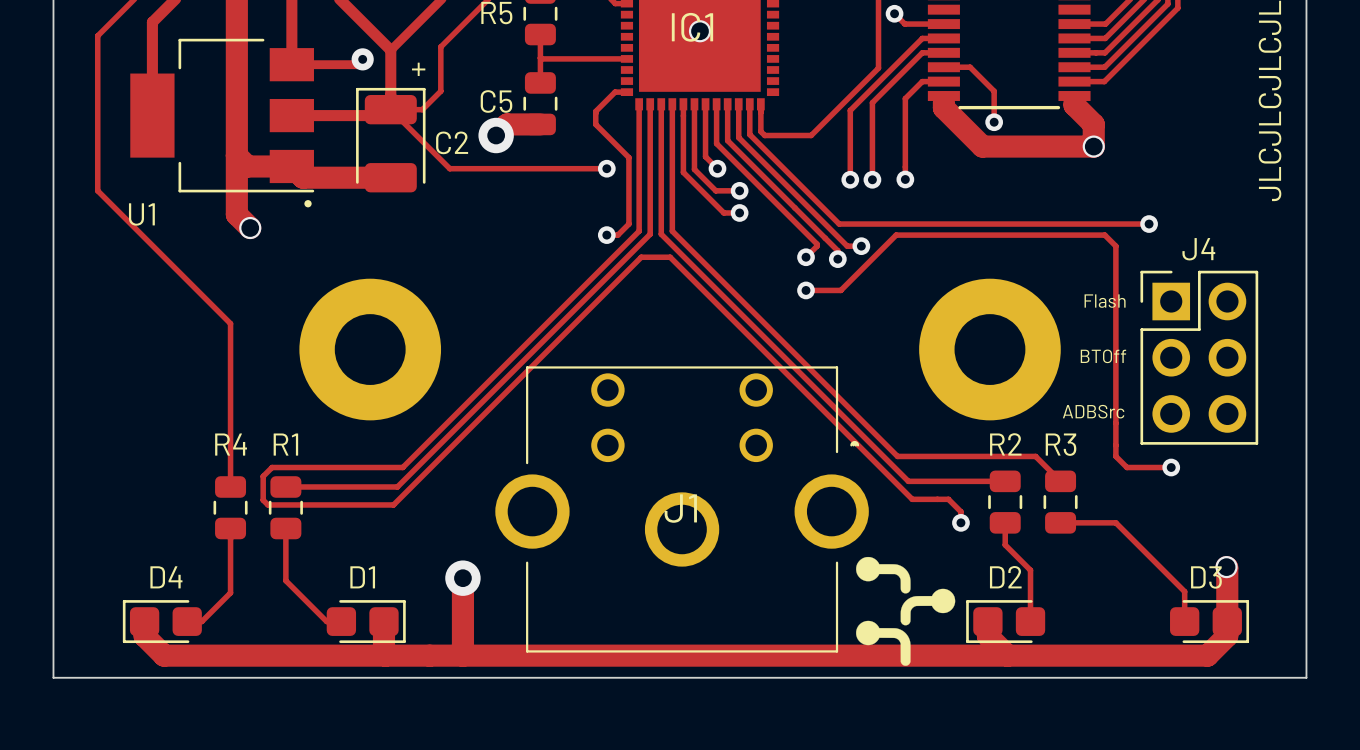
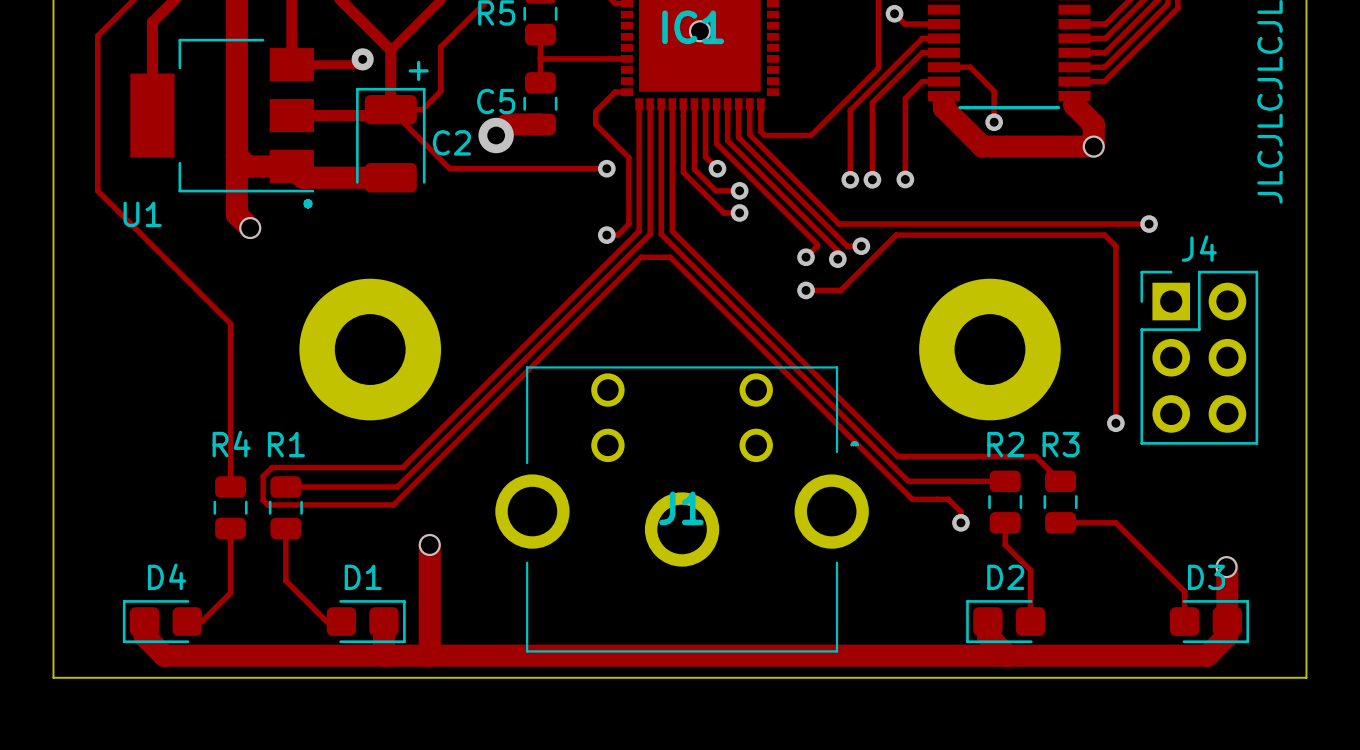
text: Flash (1105, 301) -> none
text: BTOff (1103, 356) -> none
text: ADBSrc (1093, 411) -> none
track: (1115, 423) (1115, 456) (1126, 467) (1171, 467) -> none
via position: (1171, 467) -> (1115, 423)
track: none -> (429, 544) (429, 655)
via: none -> (429, 544)
drawing: [856, 556, 956, 666] -> none
track: (462, 578) (462, 655) -> none
via: (462, 578) -> none

